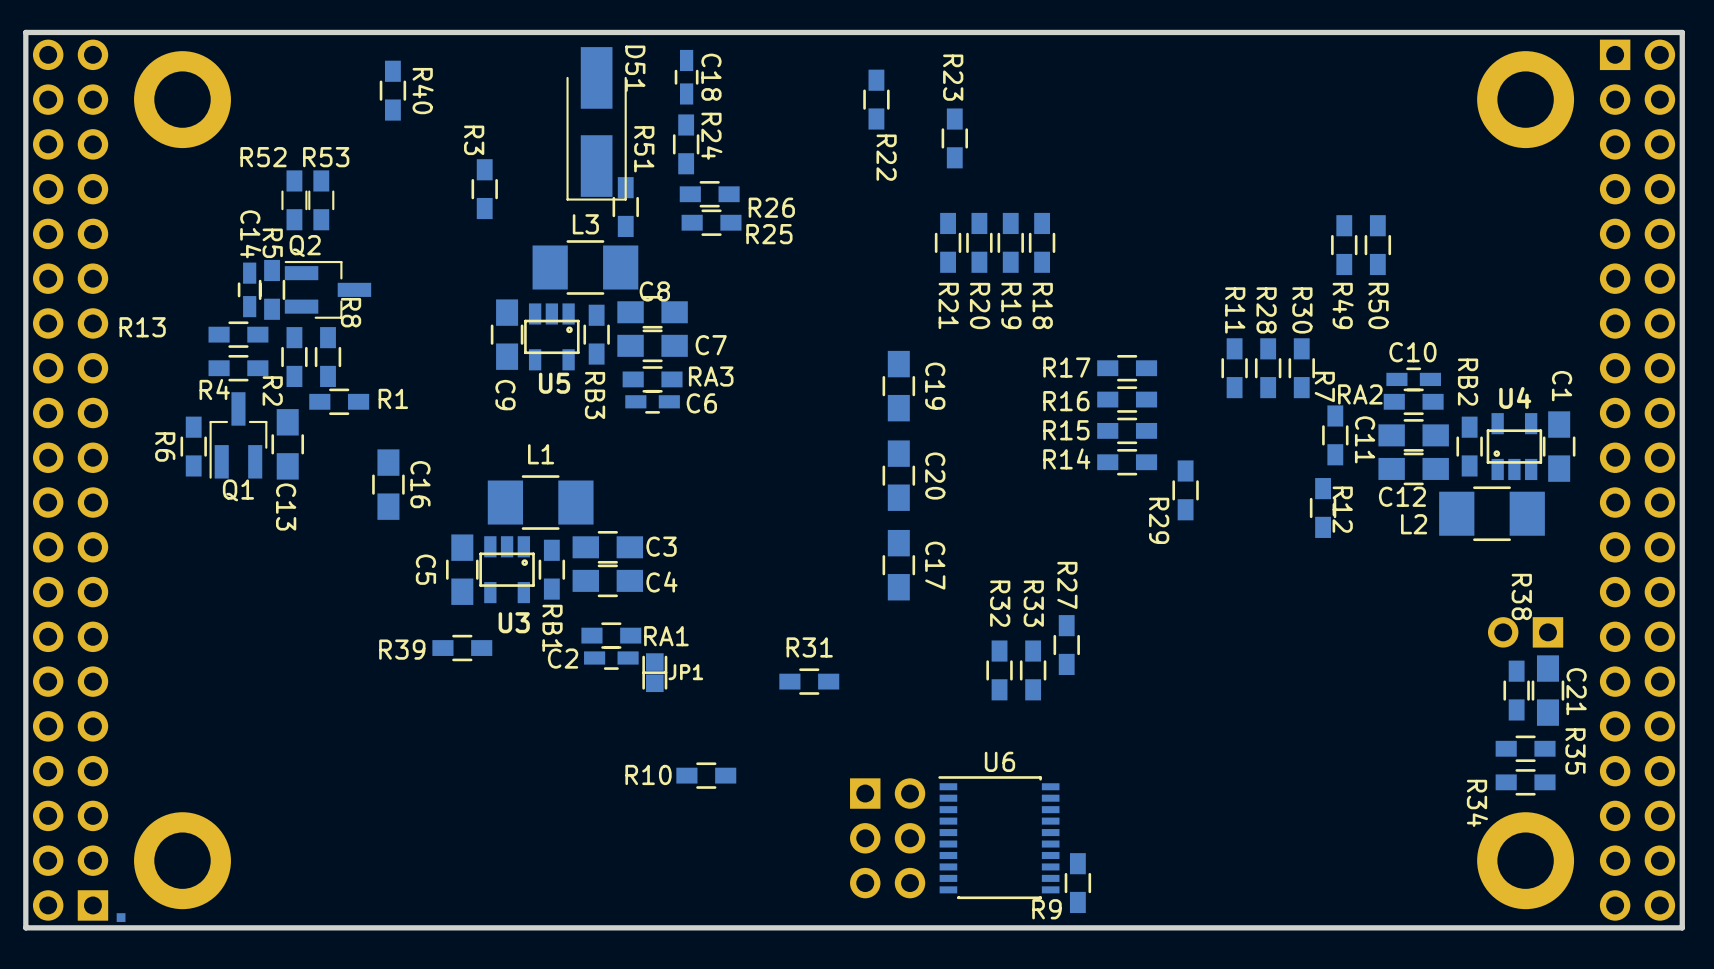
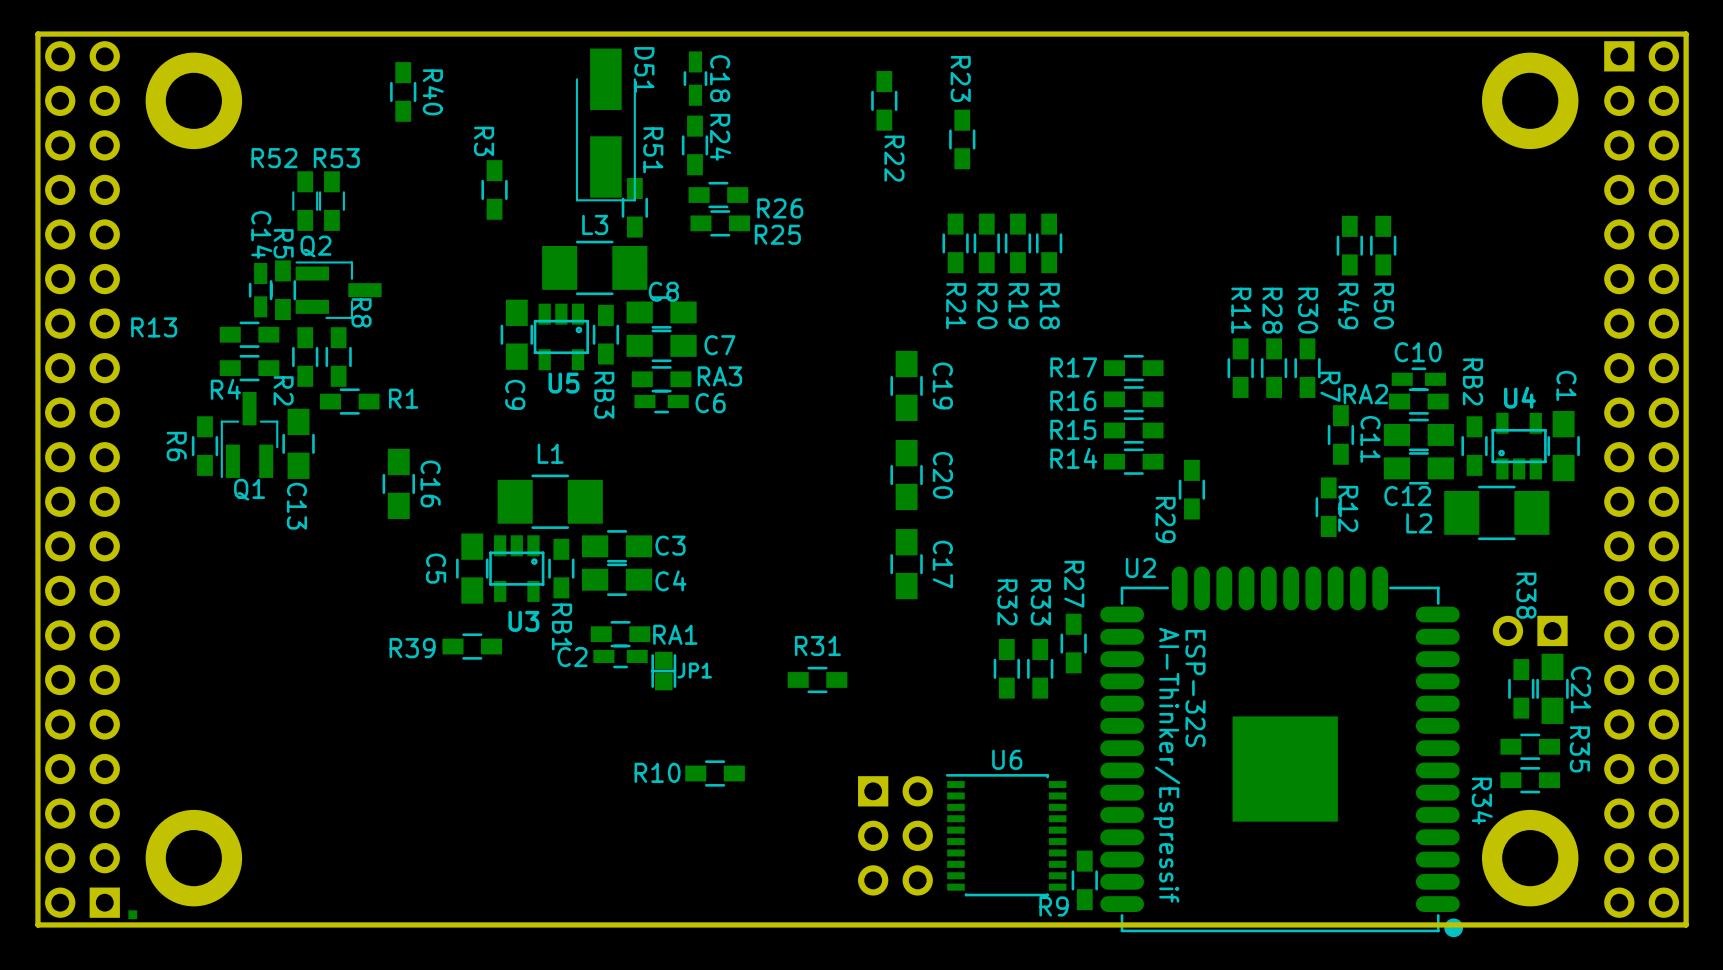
U2: none -> (1281, 751)

